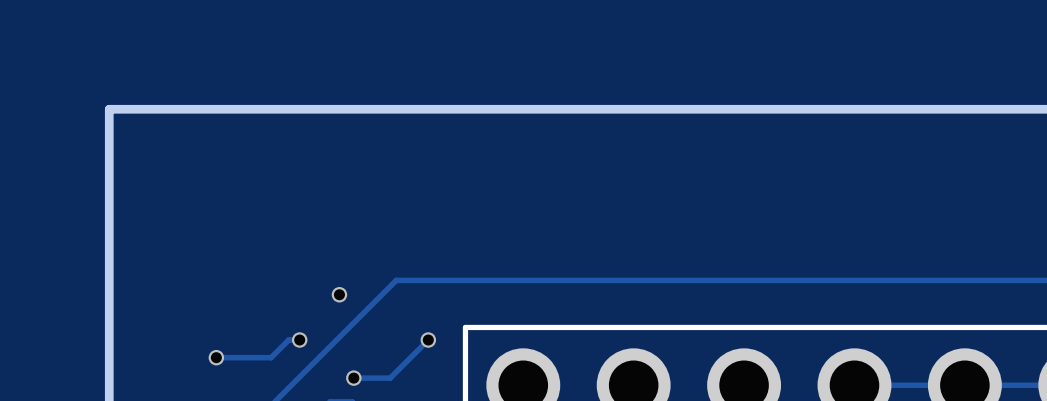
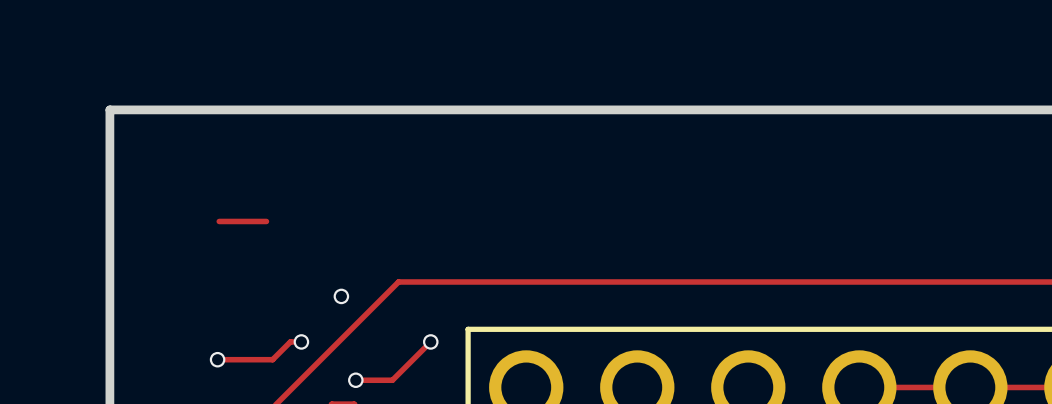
track: none -> (219, 221) (266, 221)

